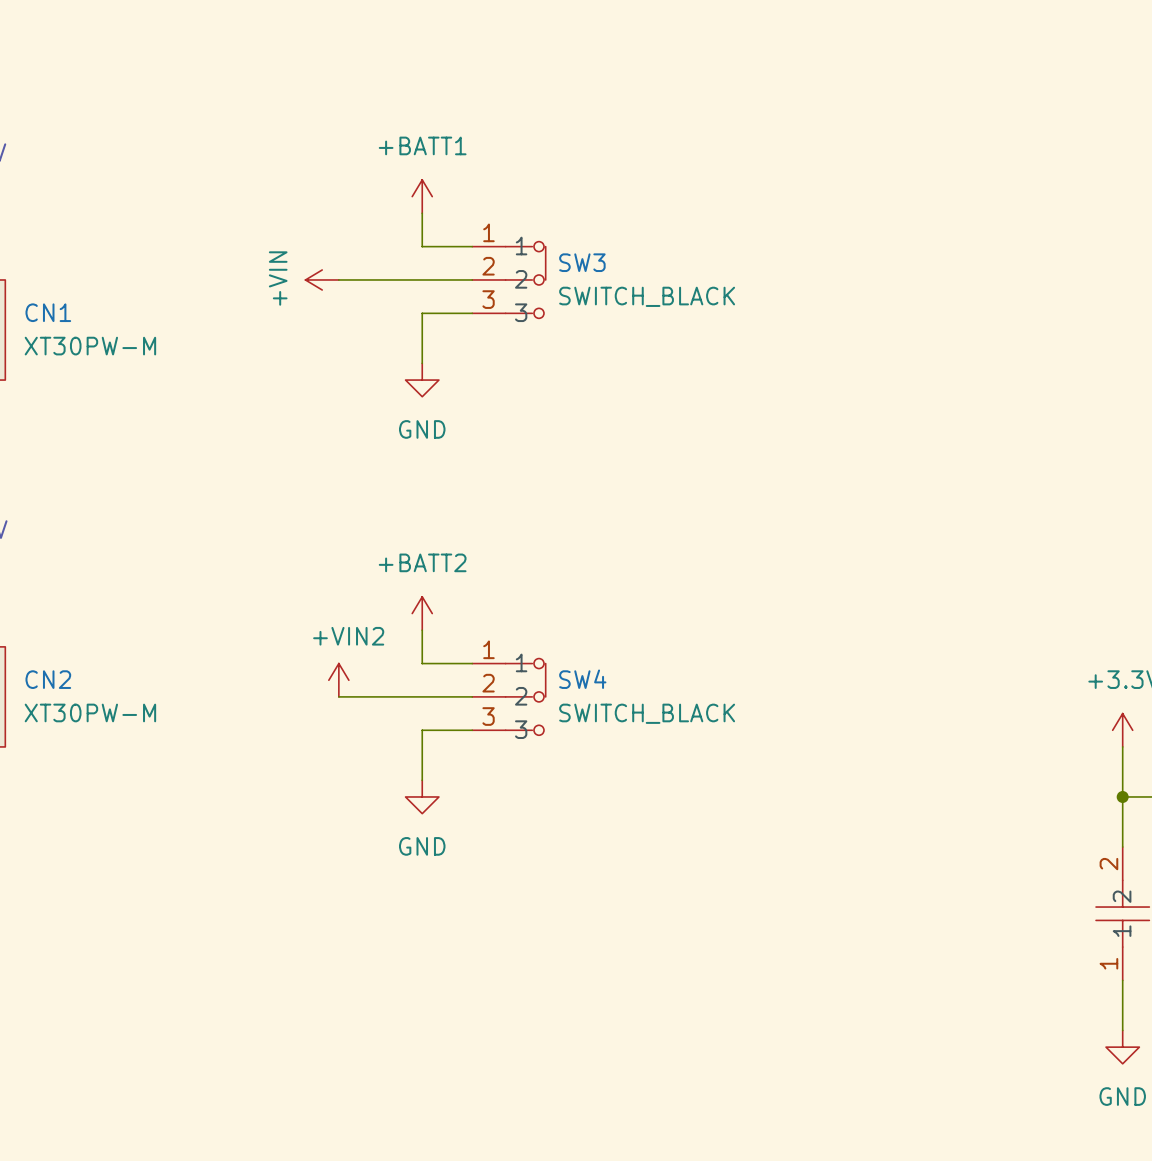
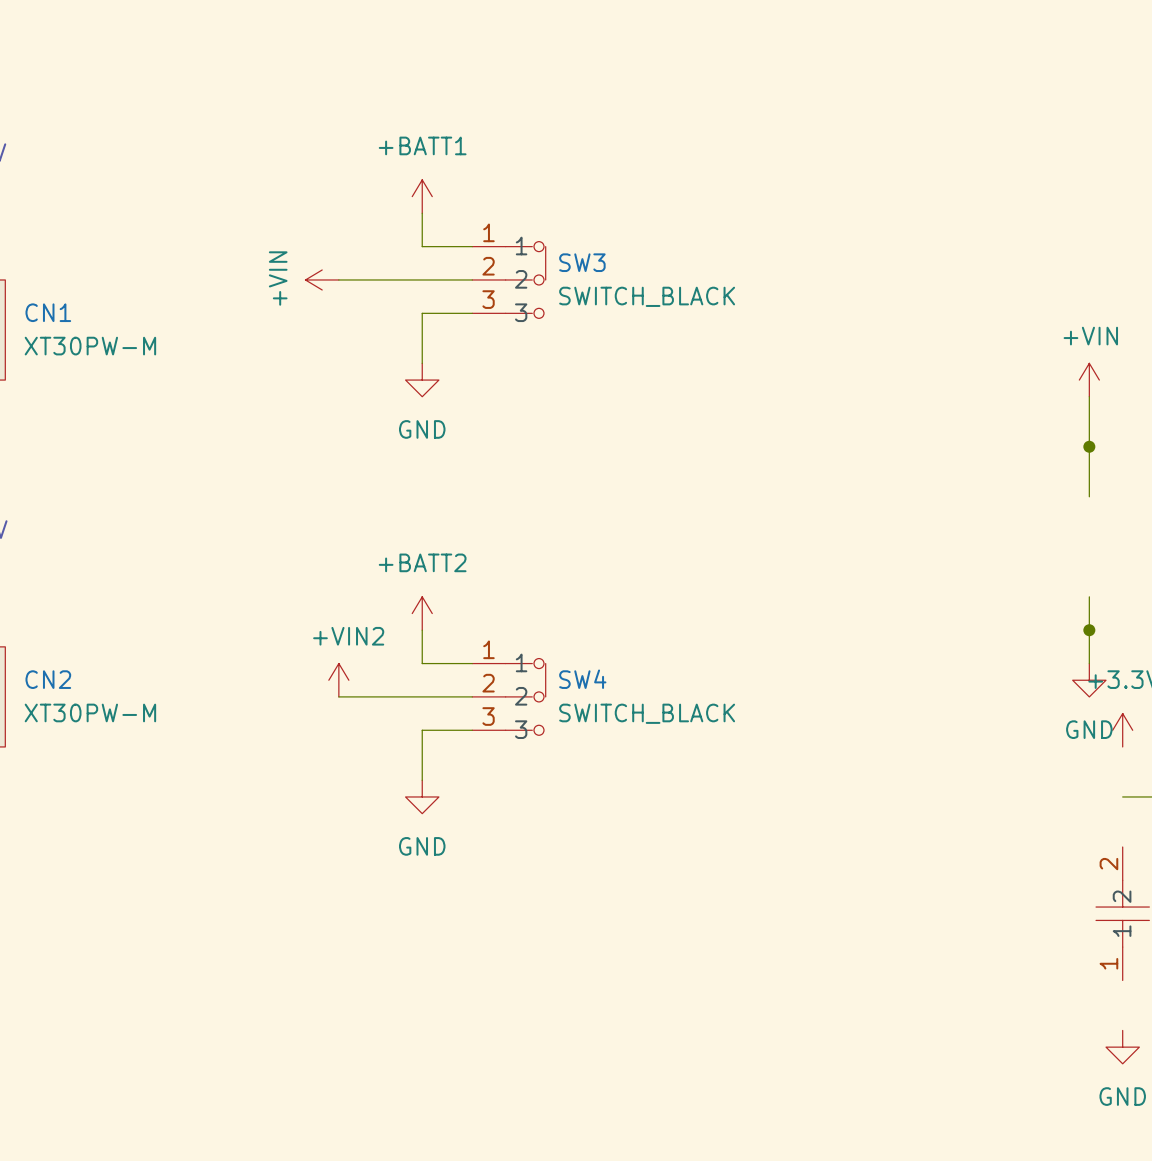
power symbol: none -> +VIN (1089, 380)
wire: none -> (1089, 396) (1089, 496)
junction: none -> (1089, 446)
wire: none -> (1089, 596) (1089, 663)
junction: none -> (1089, 630)
power symbol: none -> GND (1089, 680)
wire: (1122, 746) (1122, 847) -> none
junction: (1122, 796) -> none
wire: (1122, 980) (1122, 1030) -> none

